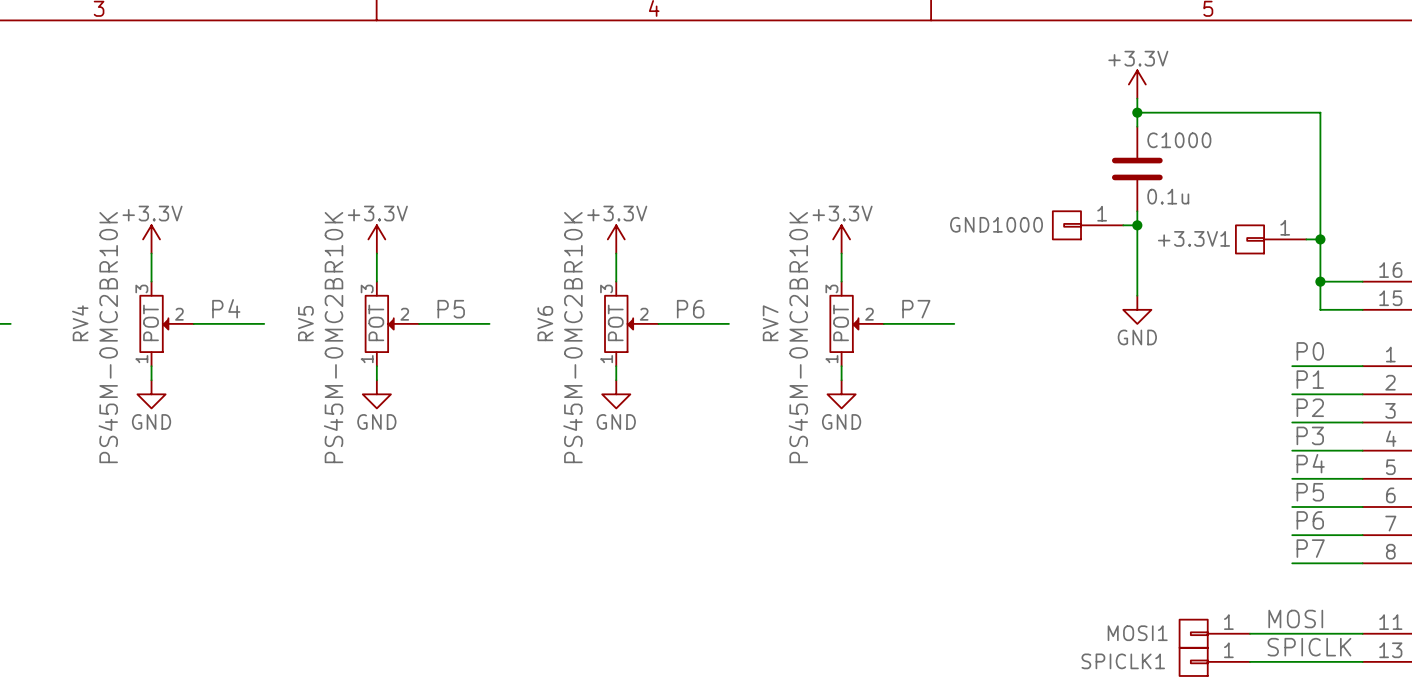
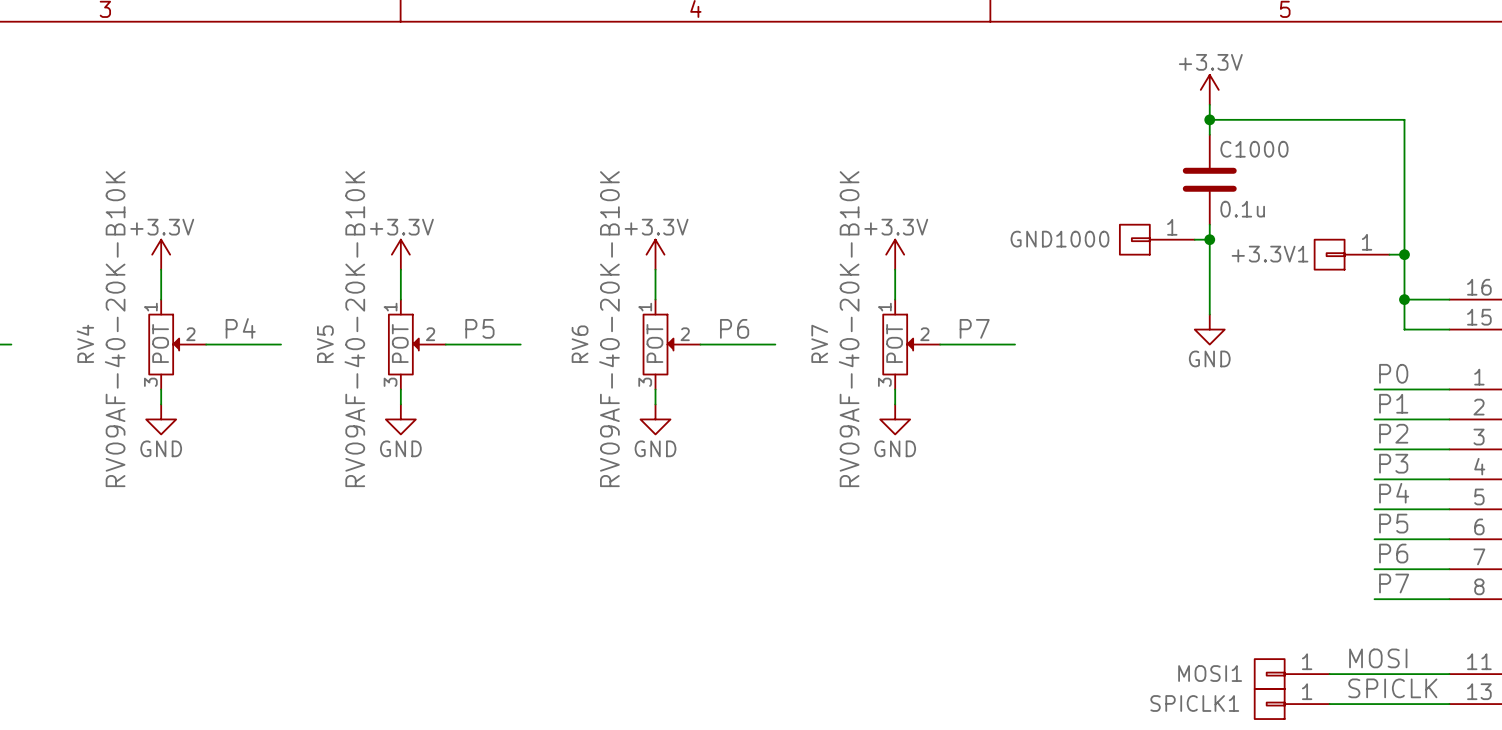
RV4 flip: as is (154, 323) -> up-down (164, 344)
RV5 flip: as is (379, 323) -> up-down (403, 344)
RV6 flip: as is (619, 323) -> up-down (658, 344)
RV7 flip: as is (844, 323) -> up-down (898, 344)
RV4 text: PS45M-0MC2BR10K (108, 337) -> RV09AF-40-20K-B10K (115, 329)
RV5 text: PS45M-0MC2BR10K (333, 337) -> RV09AF-40-20K-B10K (354, 329)
RV6 text: PS45M-0MC2BR10K (572, 337) -> RV09AF-40-20K-B10K (609, 329)
RV7 text: PS45M-0MC2BR10K (798, 337) -> RV09AF-40-20K-B10K (849, 329)

